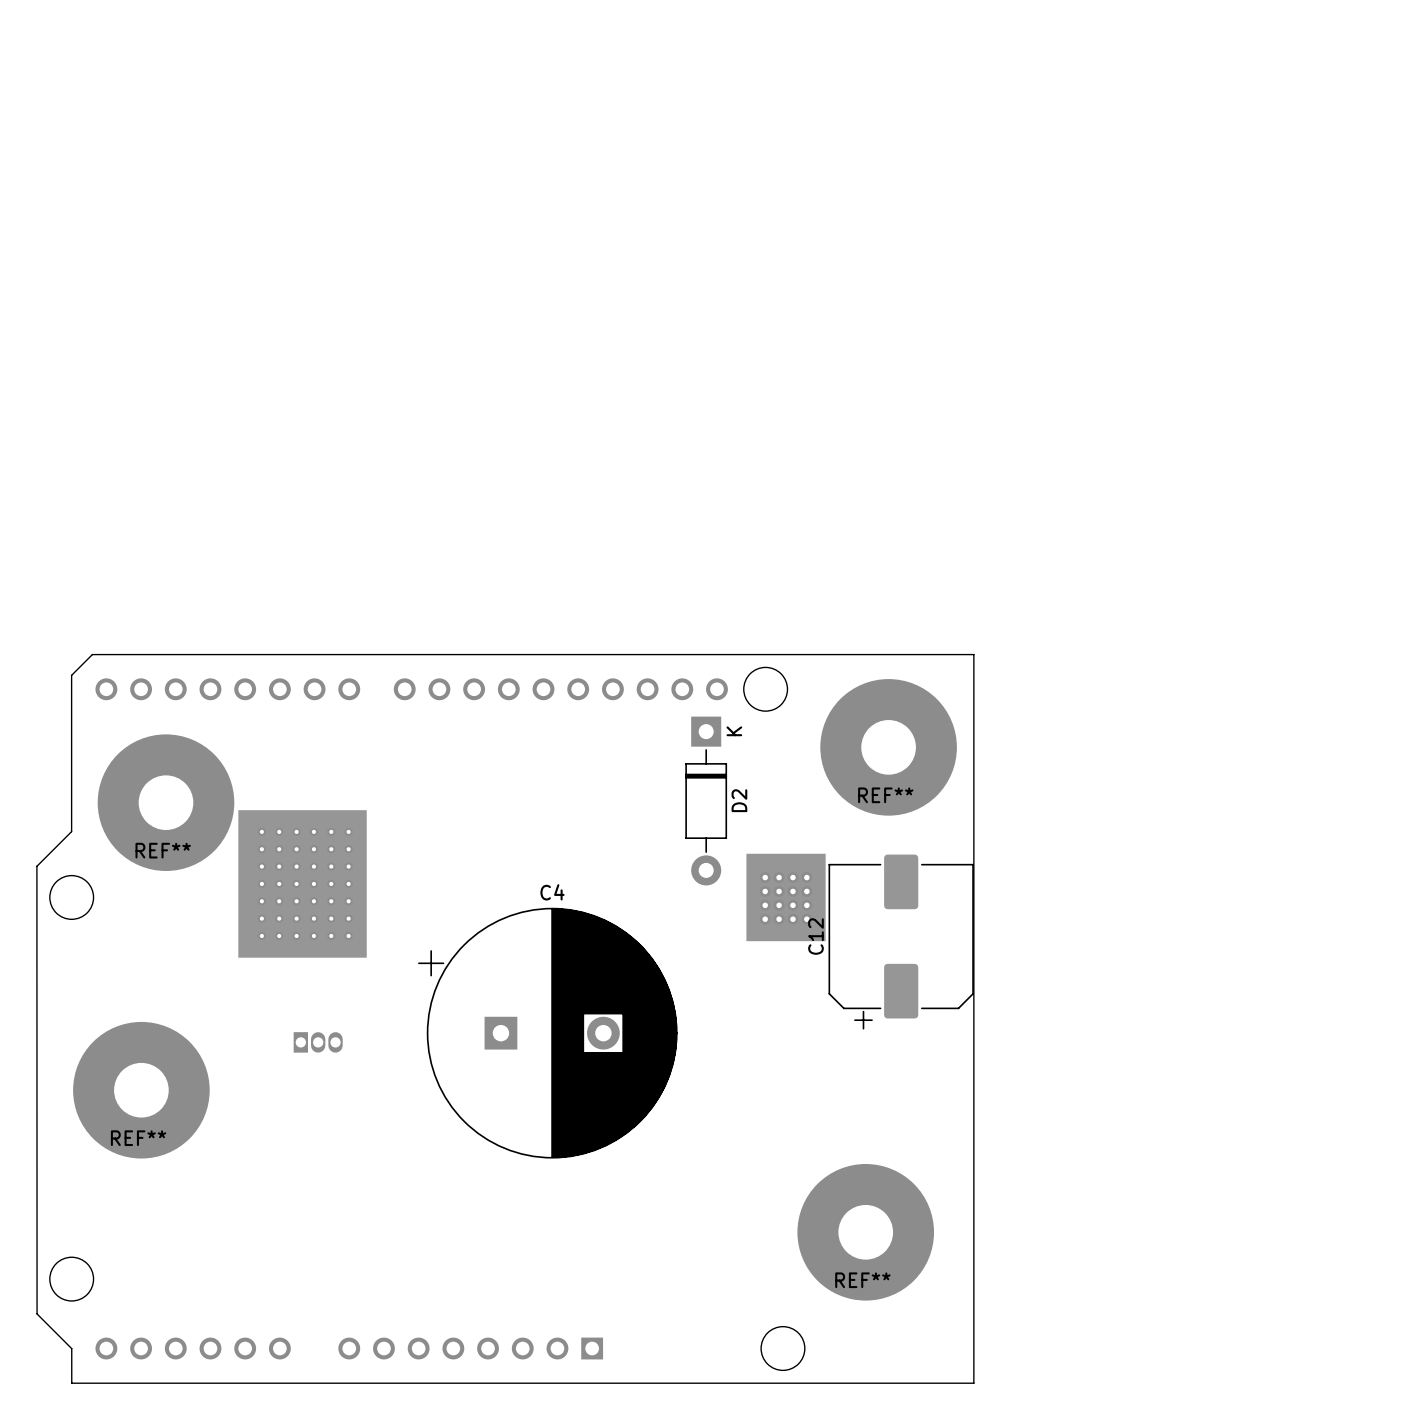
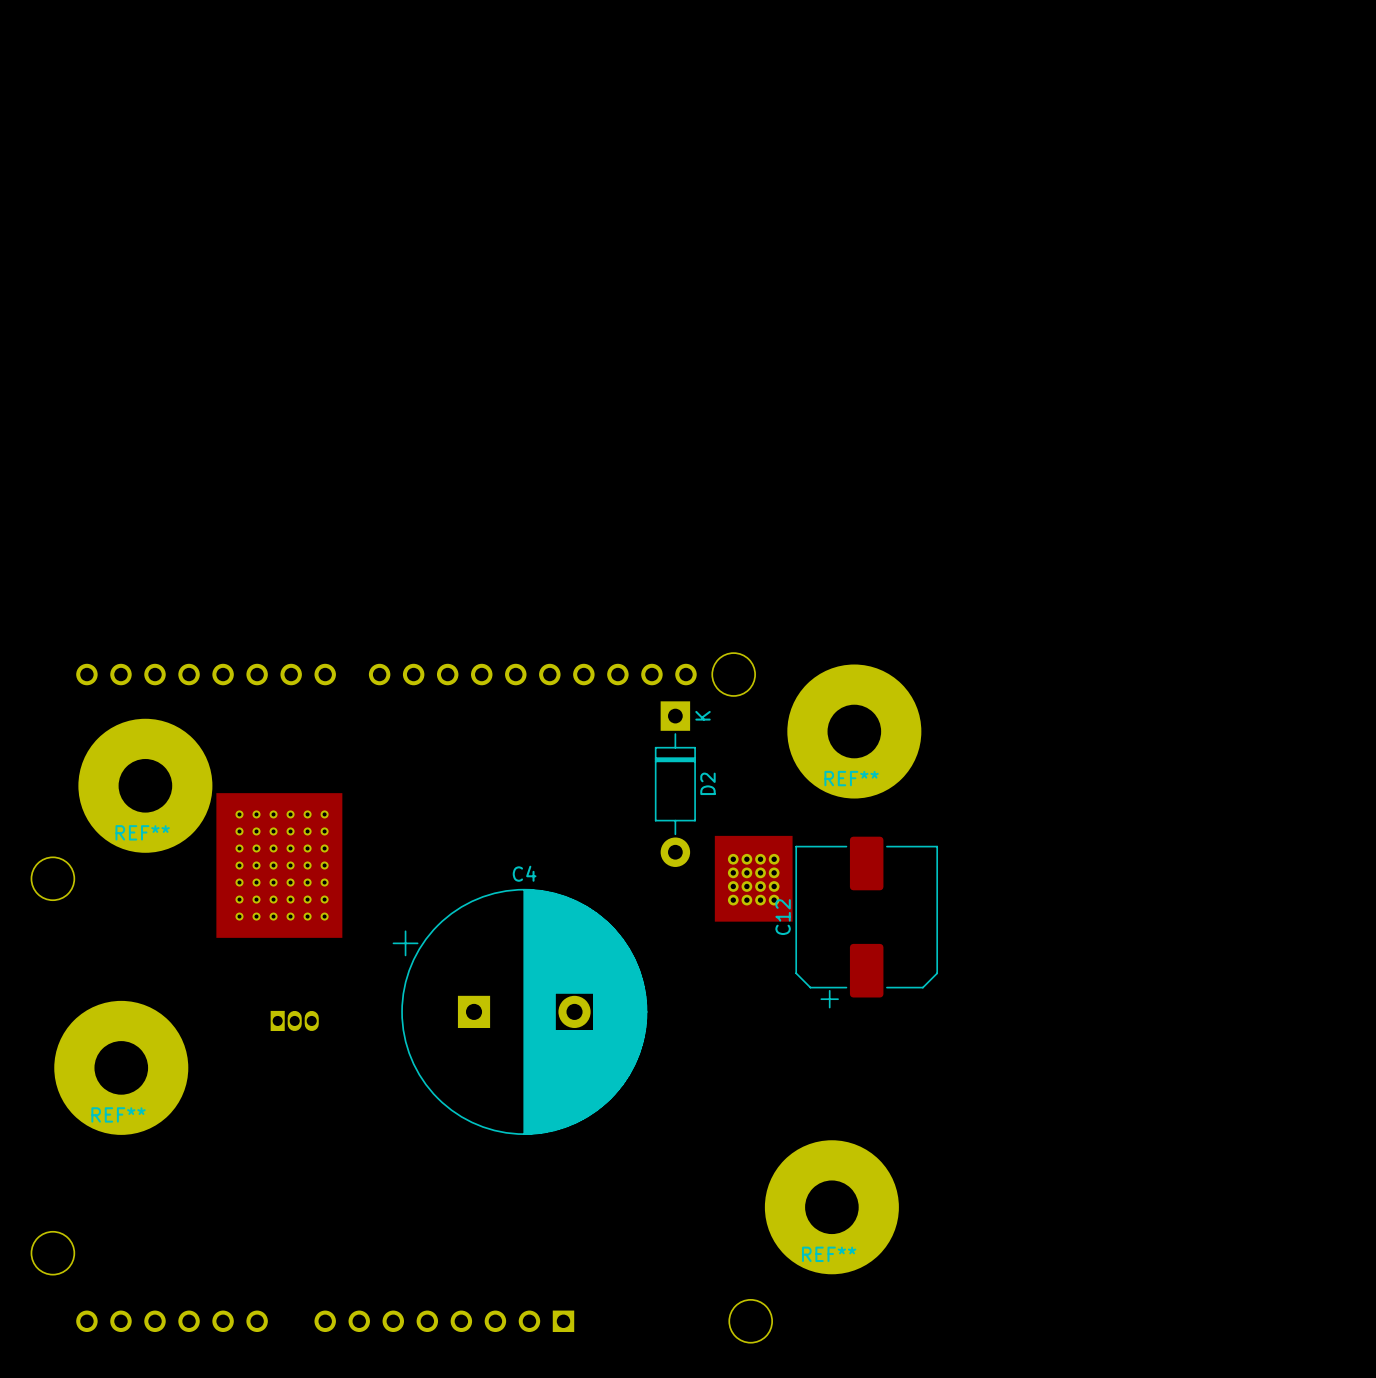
board edge: (92, 654) (973, 654) (973, 1383) (71, 1383) (71, 1348) (37, 1313) (36, 866) (71, 831) (71, 675) (92, 654) -> none

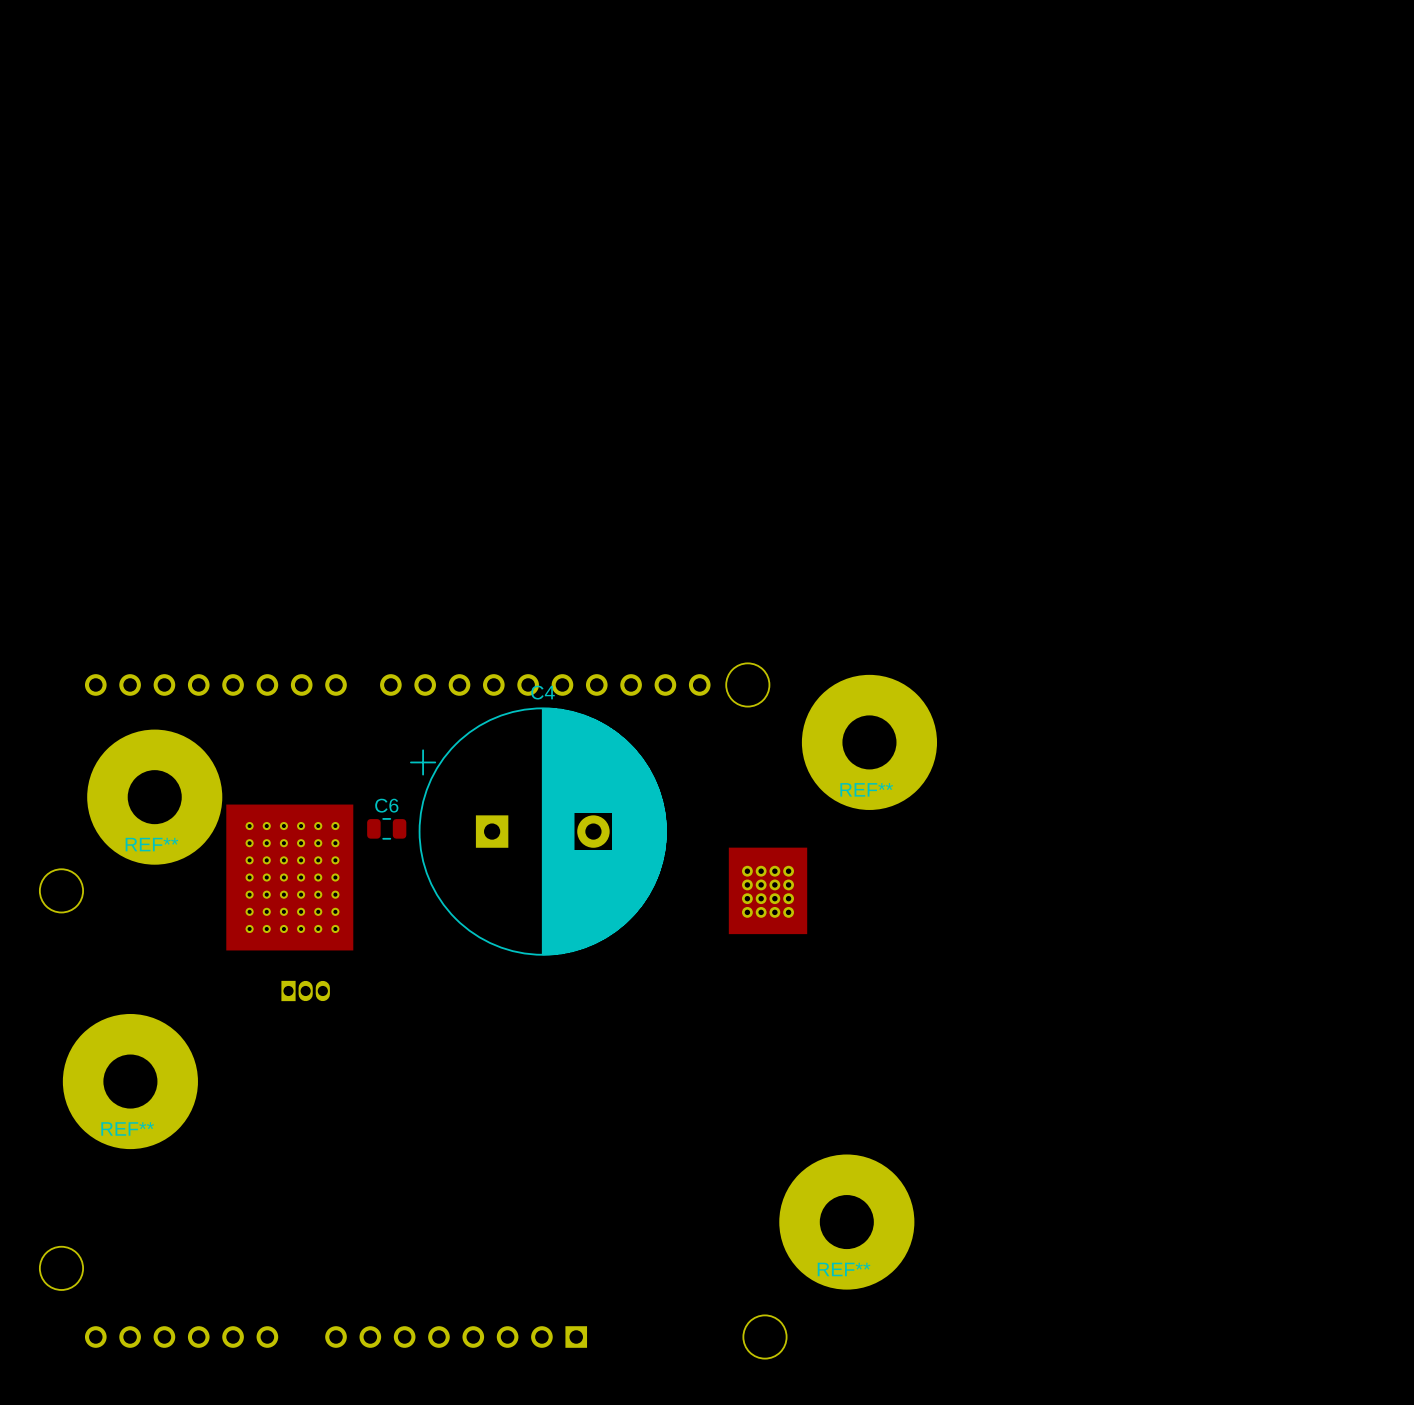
D2: (675, 784) -> none
C6: none -> (386, 828)
C12: (866, 922) -> none
C4 position: (519, 1011) -> (538, 831)
part position: (294, 1020) -> (305, 990)

